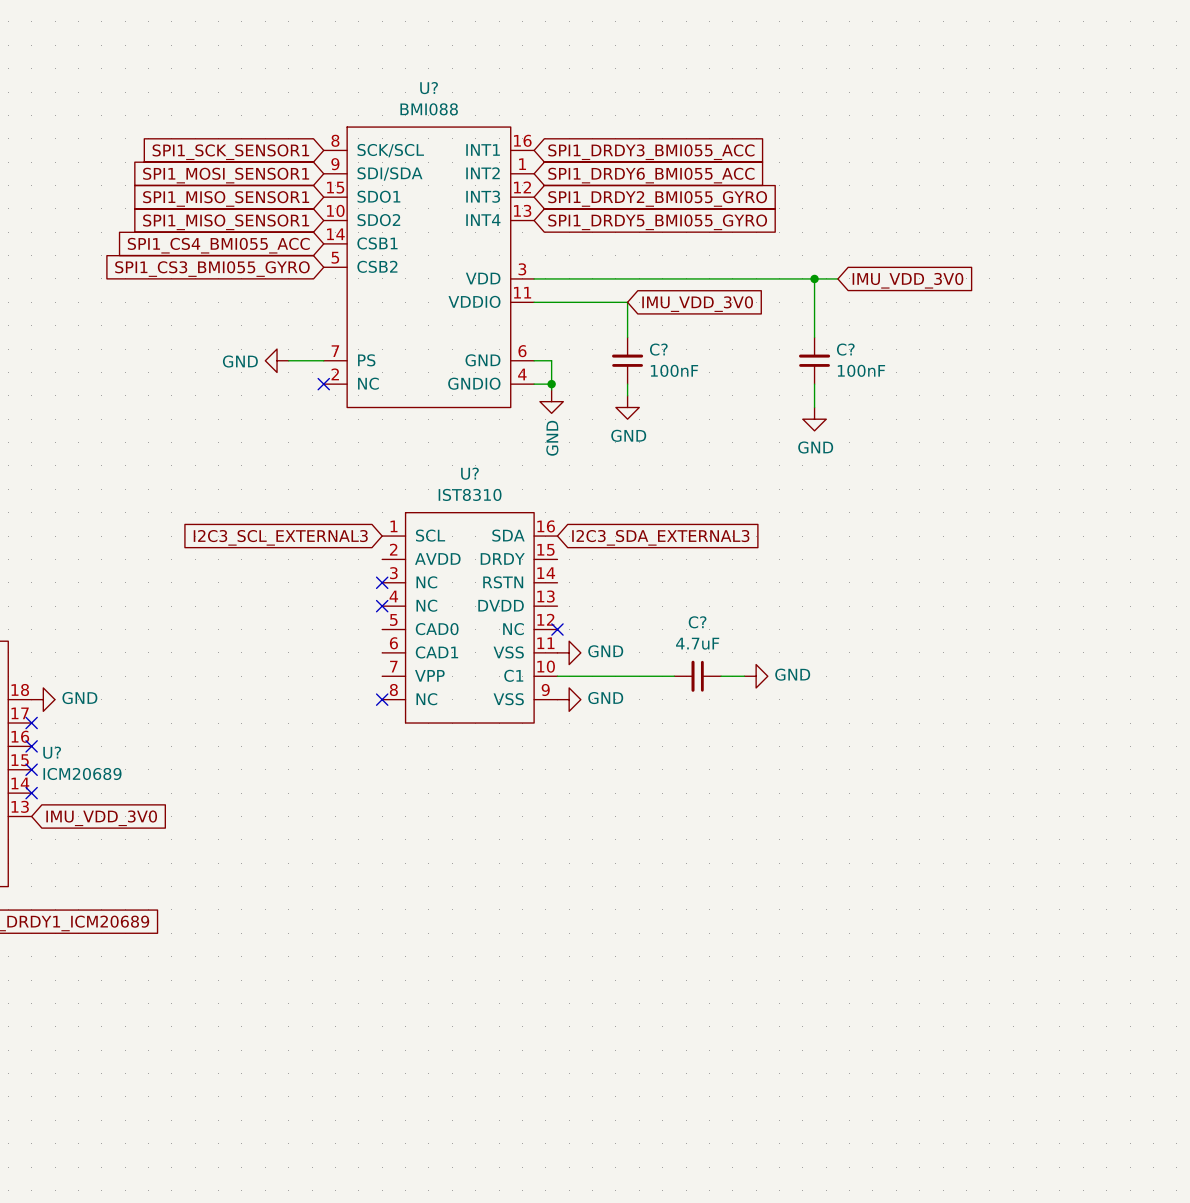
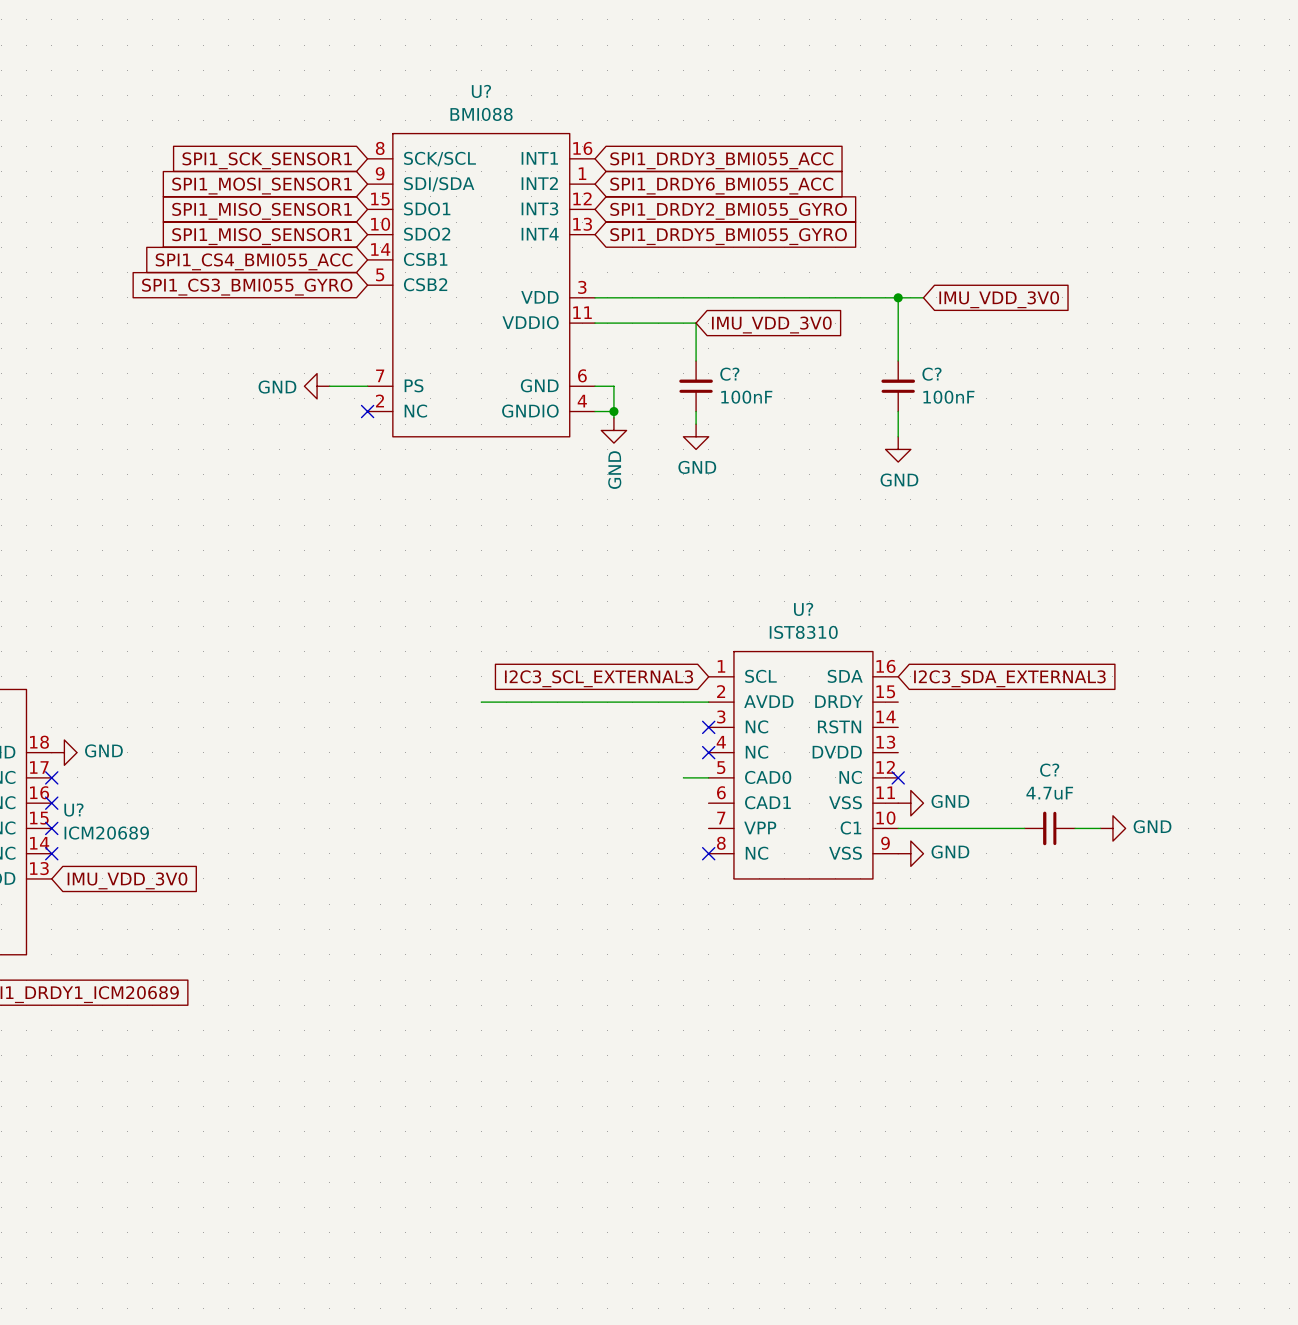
global label: I2C3_SCL_EXTERNAL3 (280, 537) -> none
global label: I2C3_SDA_EXTERNAL3 (660, 537) -> none
no-connect mark: (382, 582) -> none
no-connect mark: (382, 606) -> none
U?: IST8310 (469, 617) -> none
no-connect mark: (557, 629) -> none
global label: none -> I2C3_SCL_EXTERNAL3 (599, 678)
global label: none -> I2C3_SDA_EXTERNAL3 (1009, 678)
wire: none -> (481, 702) (708, 702)
power symbol: GND (569, 652) -> none
wire: (557, 676) (674, 676) -> none
no-connect mark: none -> (708, 727)
C?: 4.7uF (697, 676) -> none
wire: (721, 676) (744, 676) -> (683, 777) (708, 777)
power symbol: GND (756, 676) -> none
no-connect mark: (382, 699) -> none
power symbol: GND (569, 699) -> none
no-connect mark: none -> (708, 752)
U?: none -> IST8310 (803, 765)
no-connect mark: none -> (898, 777)
power symbol: none -> GND (910, 803)
wire: none -> (898, 828) (1024, 828)
C?: none -> 4.7uF (1049, 828)
wire: none -> (1075, 828) (1100, 828)
power symbol: none -> GND (1112, 828)
no-connect mark: none -> (708, 853)
power symbol: none -> GND (910, 853)

